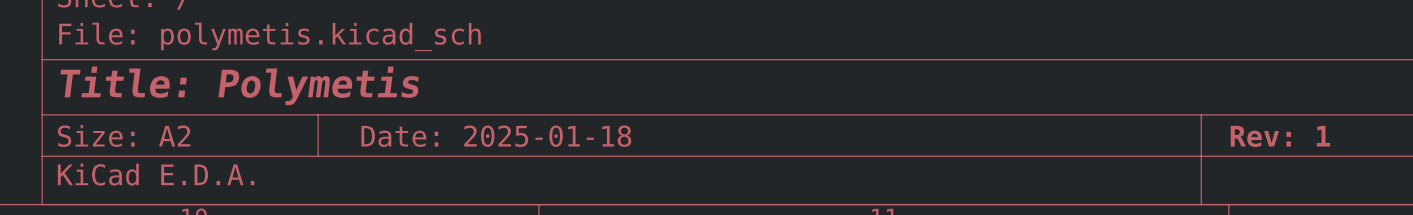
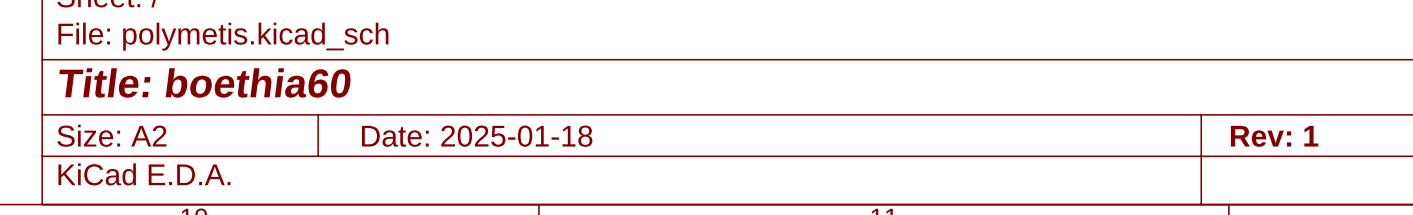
title block: Title: Polymetis (239, 85) -> Title: boethia60 (205, 82)

